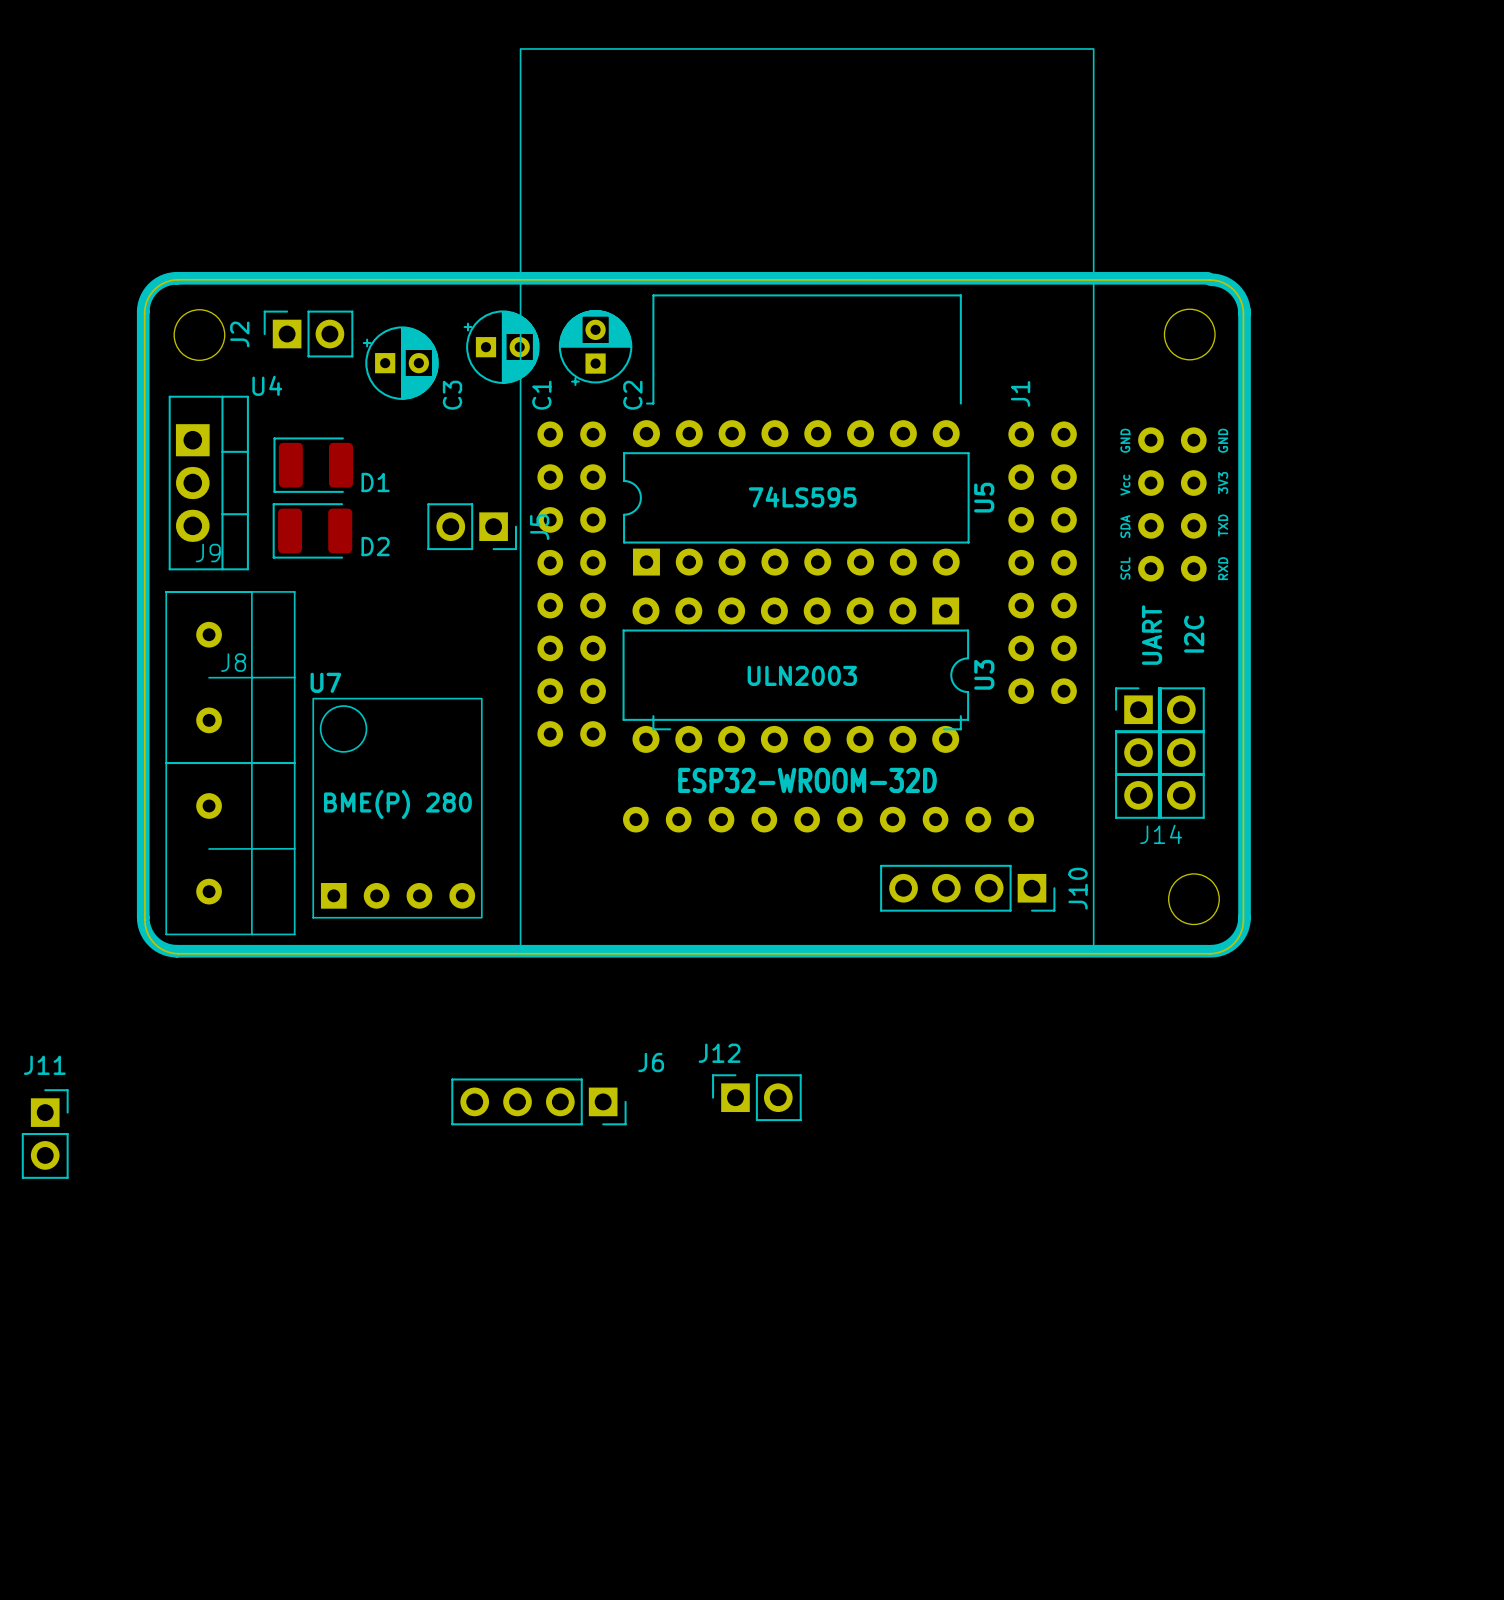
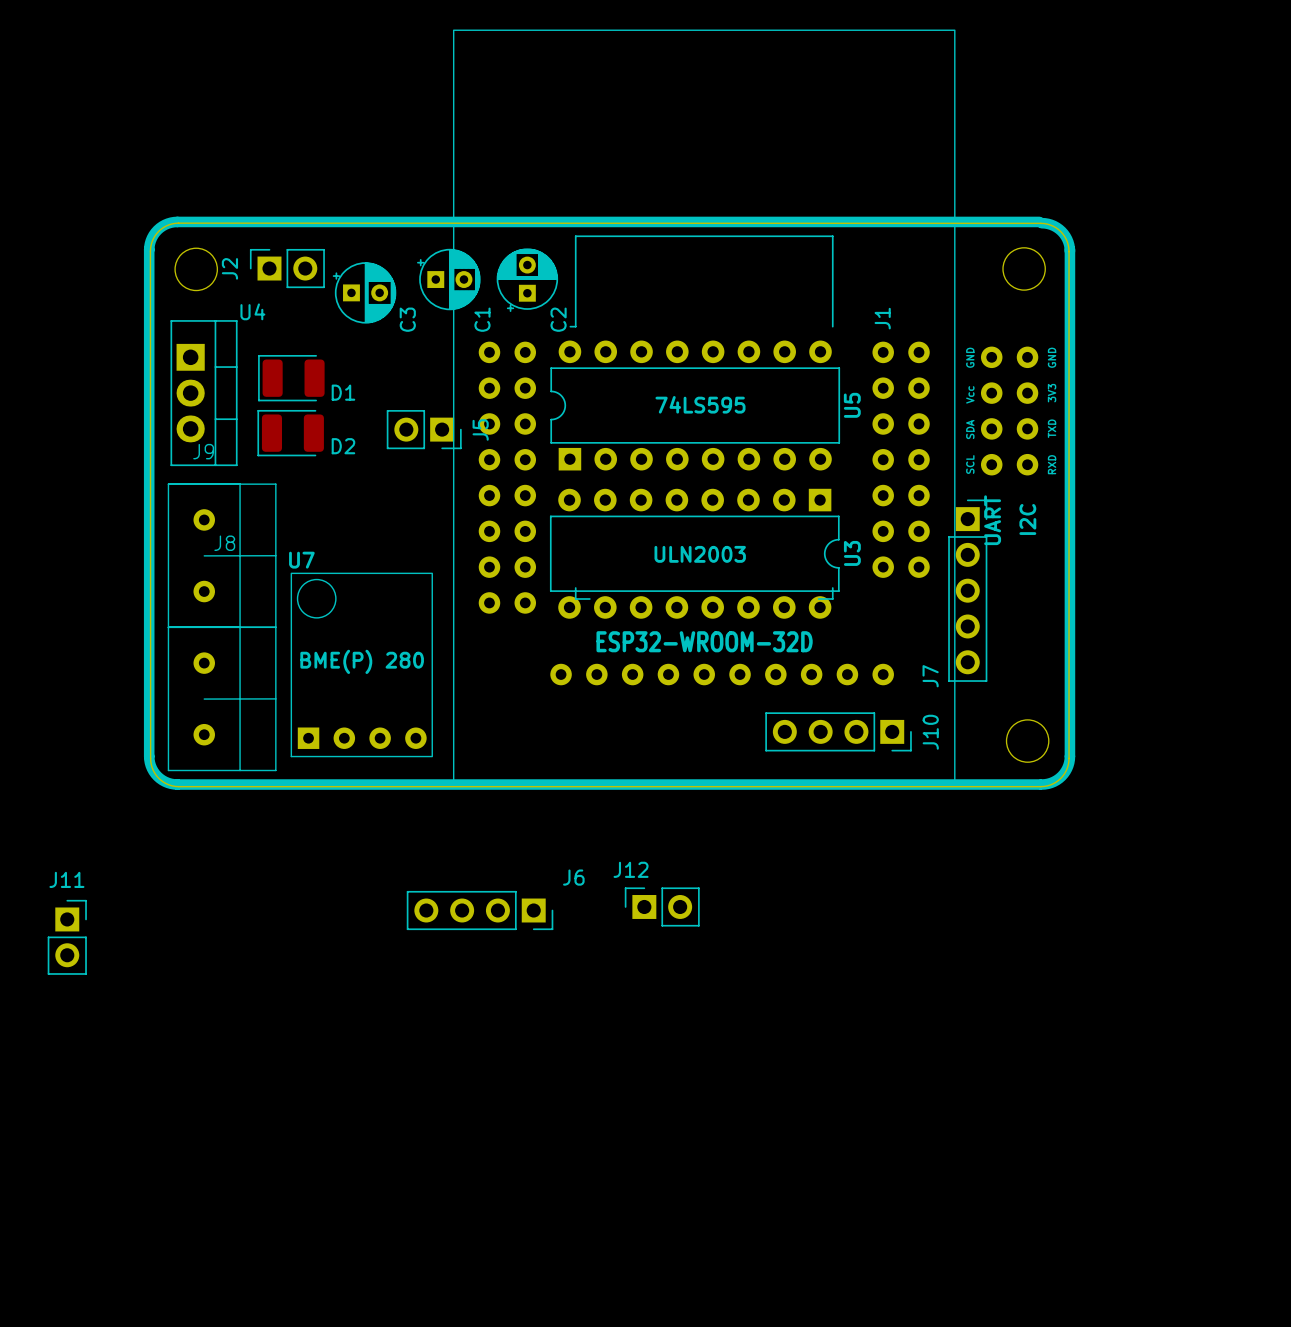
J1 footprint: [519, 48, 1095, 949] -> [452, 29, 956, 783]
J7: none -> (967, 590)
J14: (1159, 753) -> none

